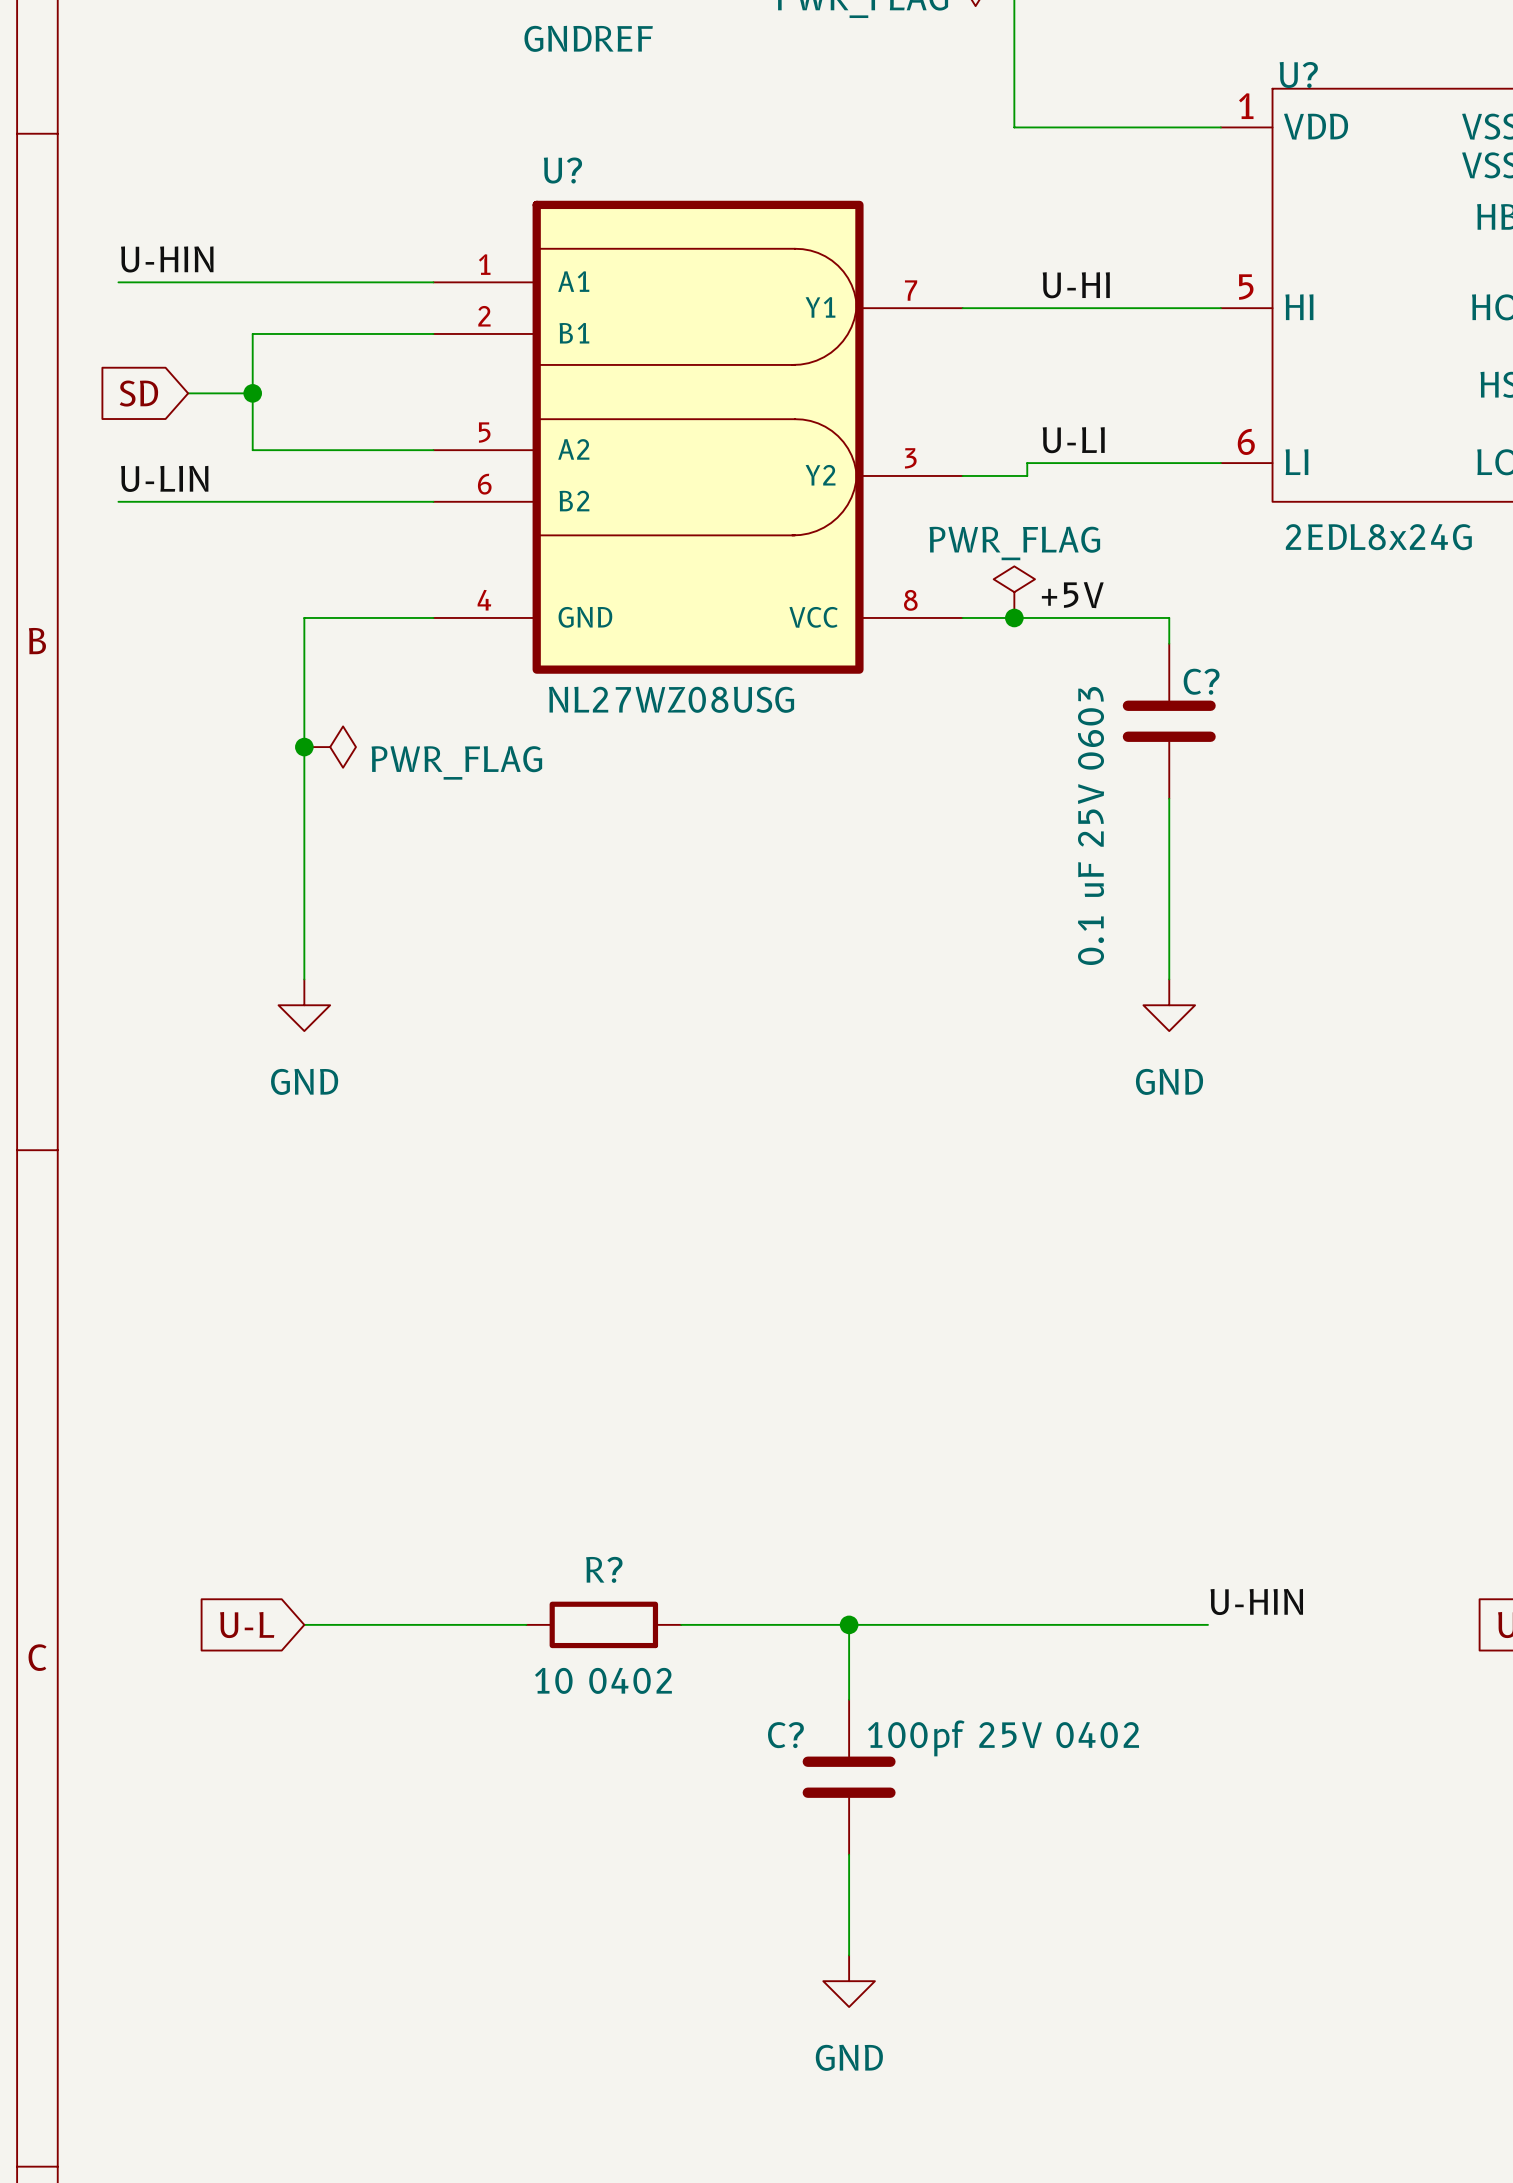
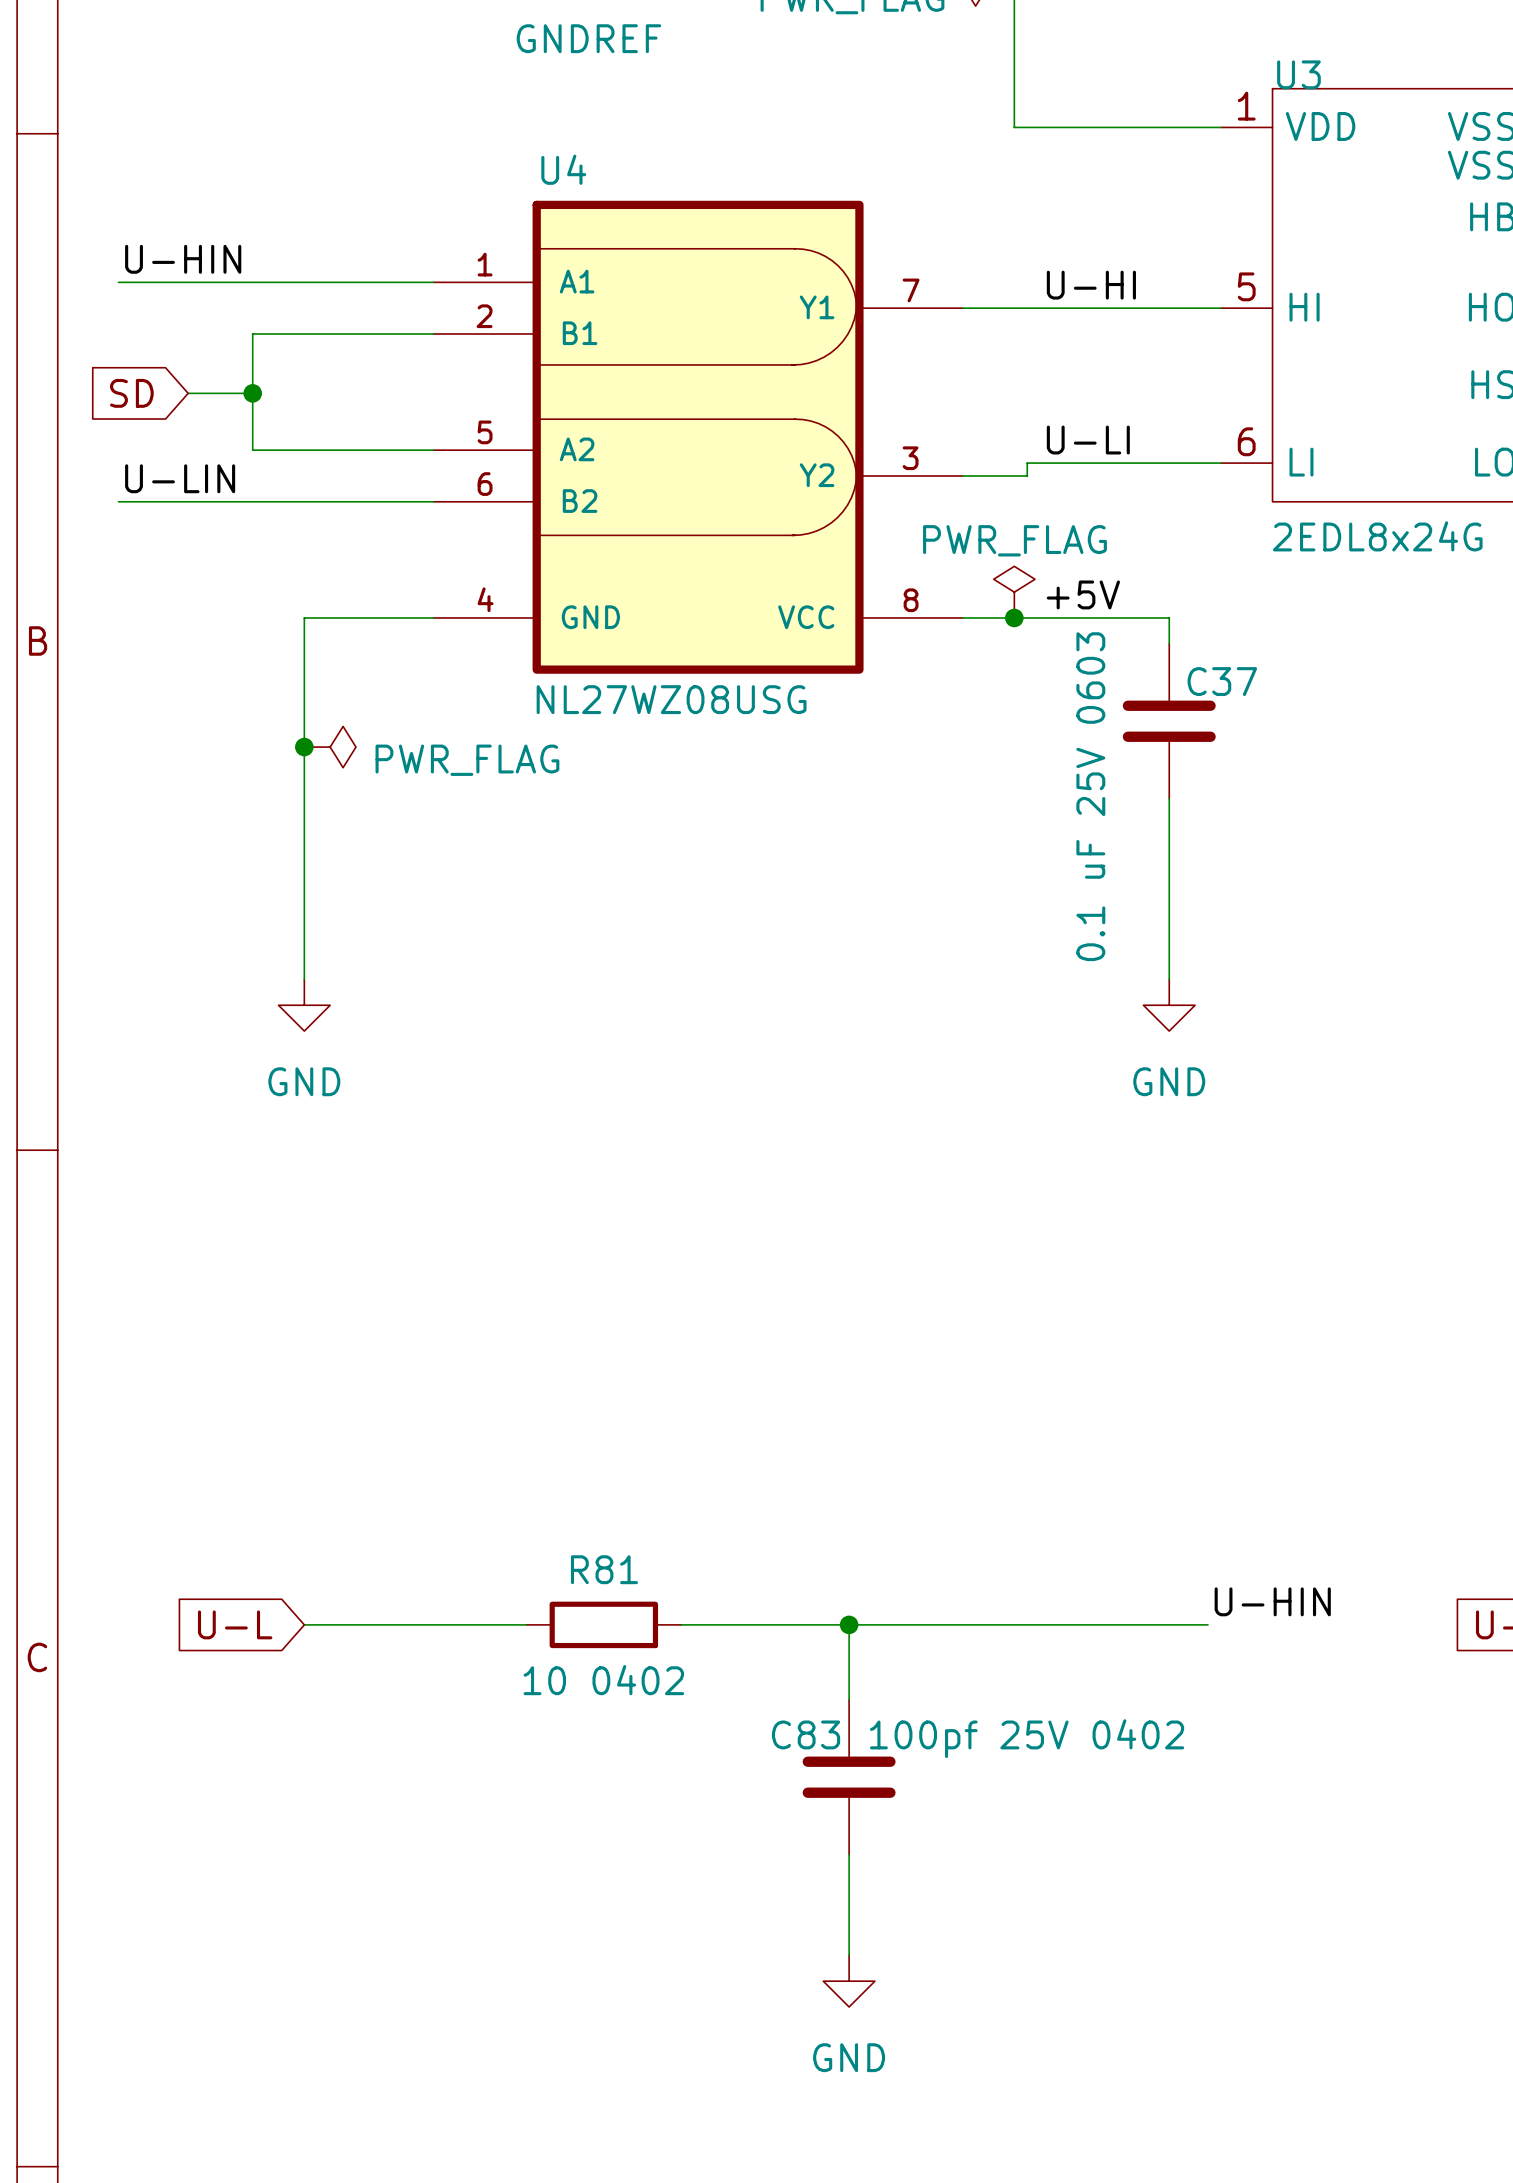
U? name: U? (1298, 74) -> U3 (1298, 74)
U? name: U? (562, 170) -> U4 (563, 169)
C? name: C? (1201, 681) -> C37 (1222, 681)
R? name: R? (604, 1569) -> R81 (604, 1569)
C? name: C? (785, 1735) -> C83 (806, 1734)

